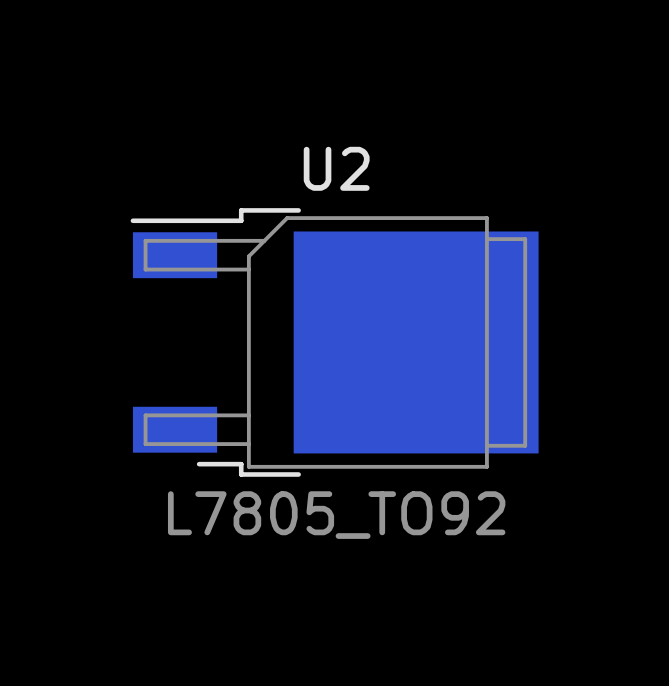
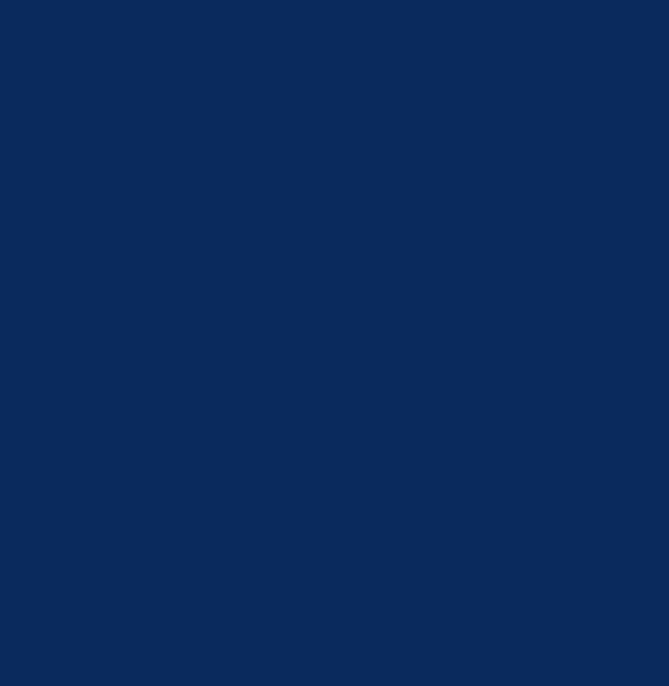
U2: L7805_TO92 (334, 342) -> none

